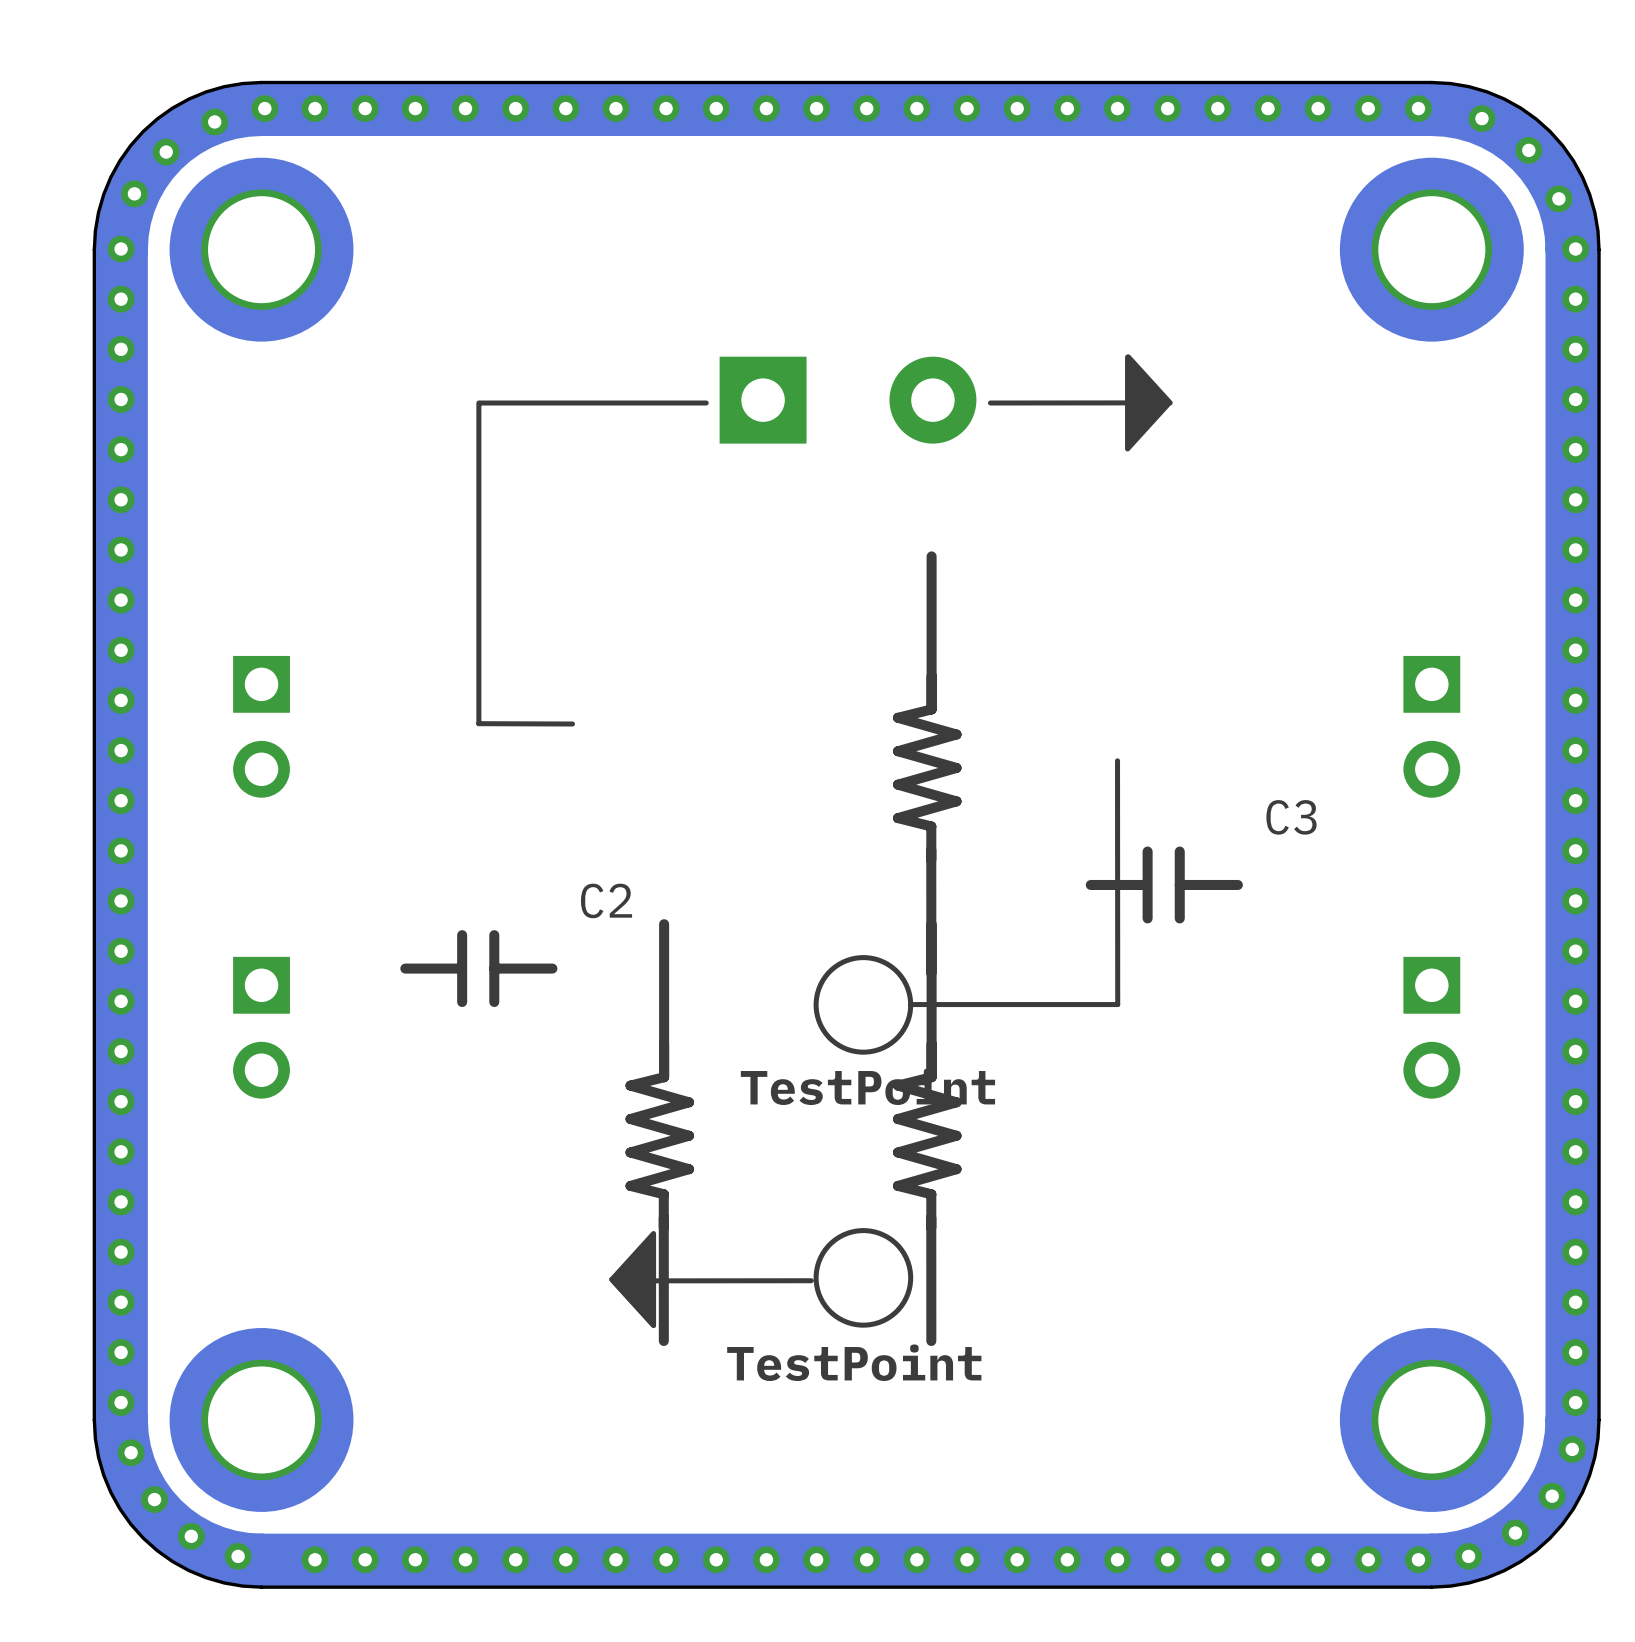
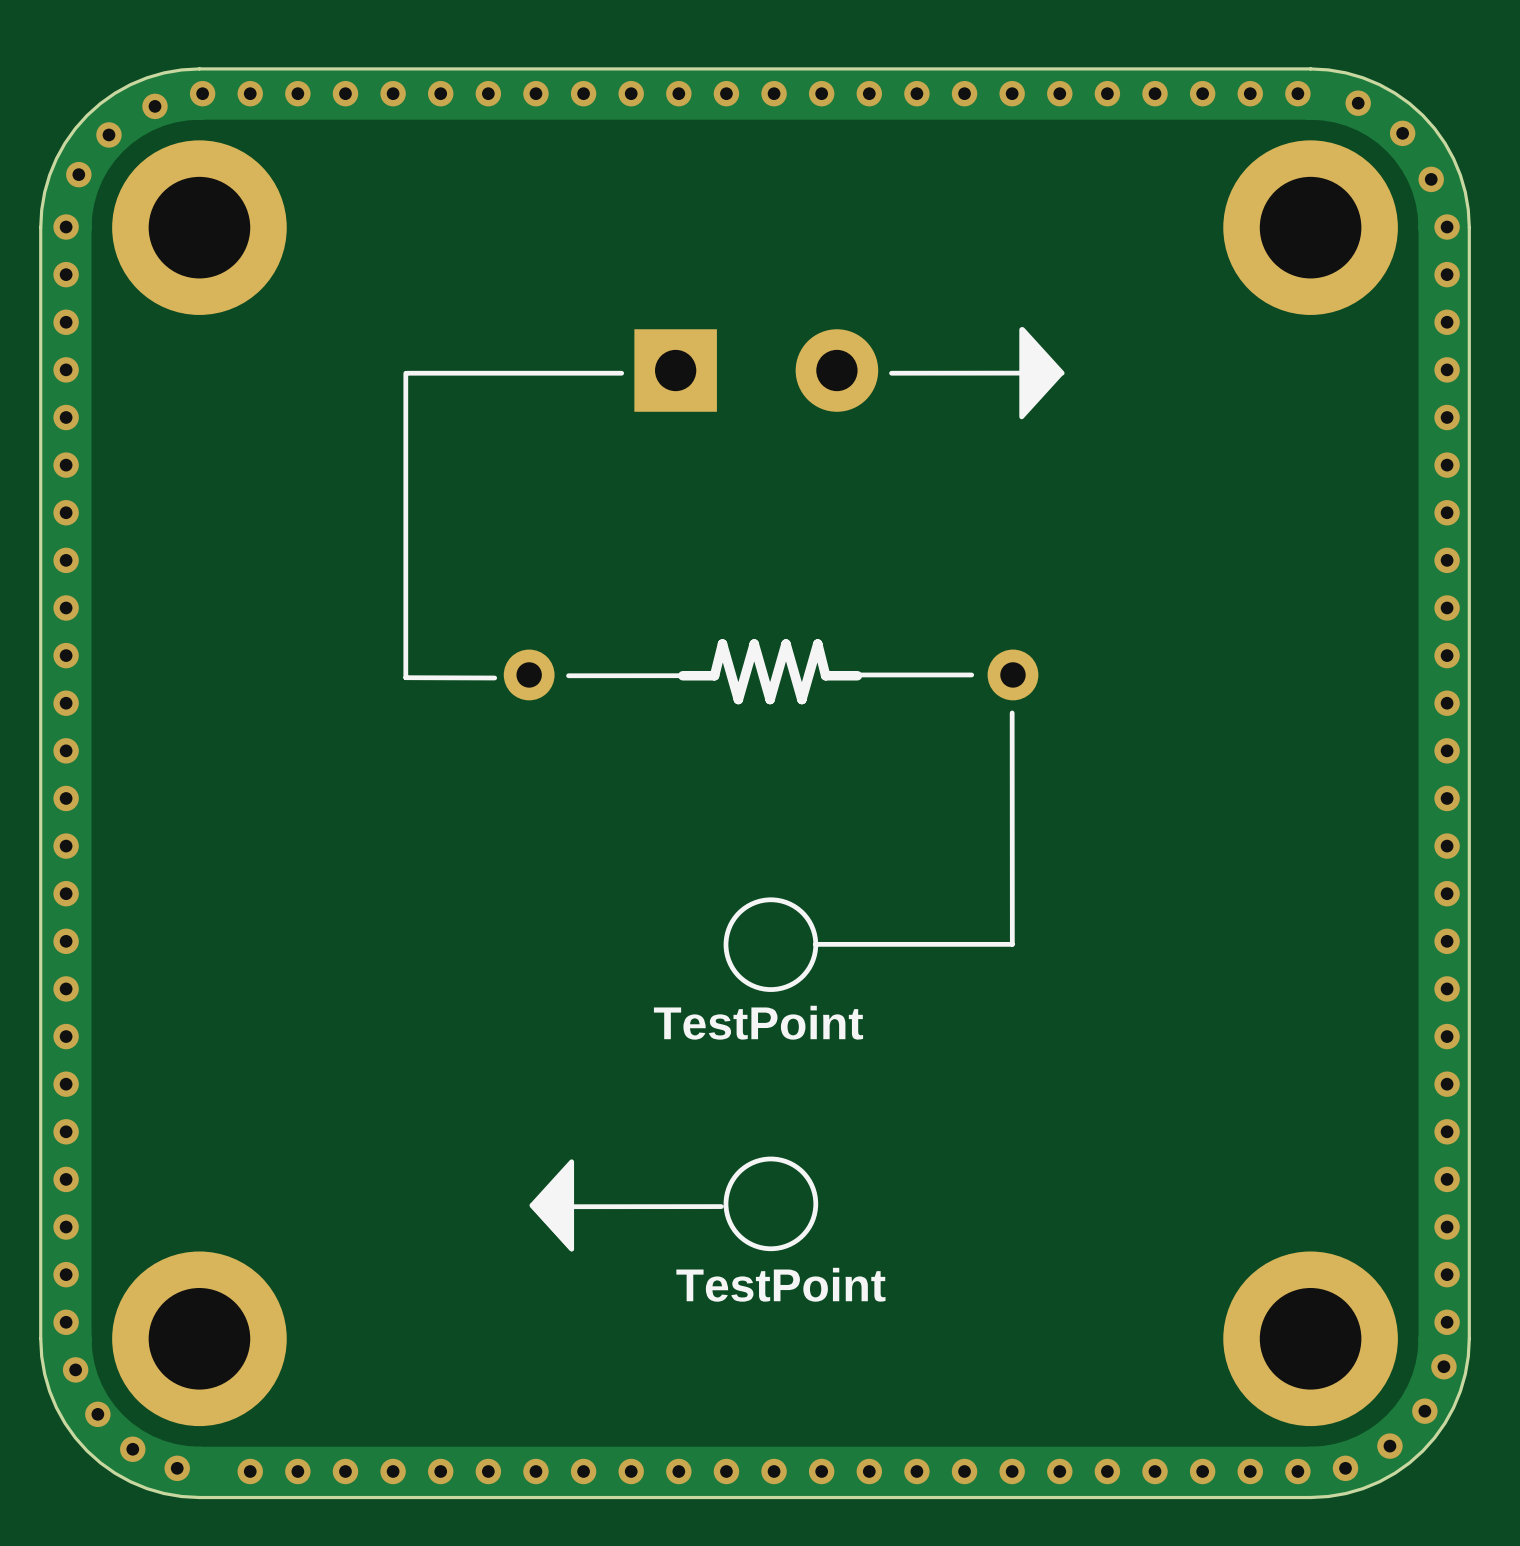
part: none -> (771, 671)
part: (261, 726) -> none
part: (1431, 726) -> none
part: (927, 764) -> none
C3: (1164, 884) -> none
C2: (478, 968) -> none
part: (261, 1027) -> none
part: (1431, 1027) -> none
part: (659, 1132) -> none
part: (927, 1132) -> none

